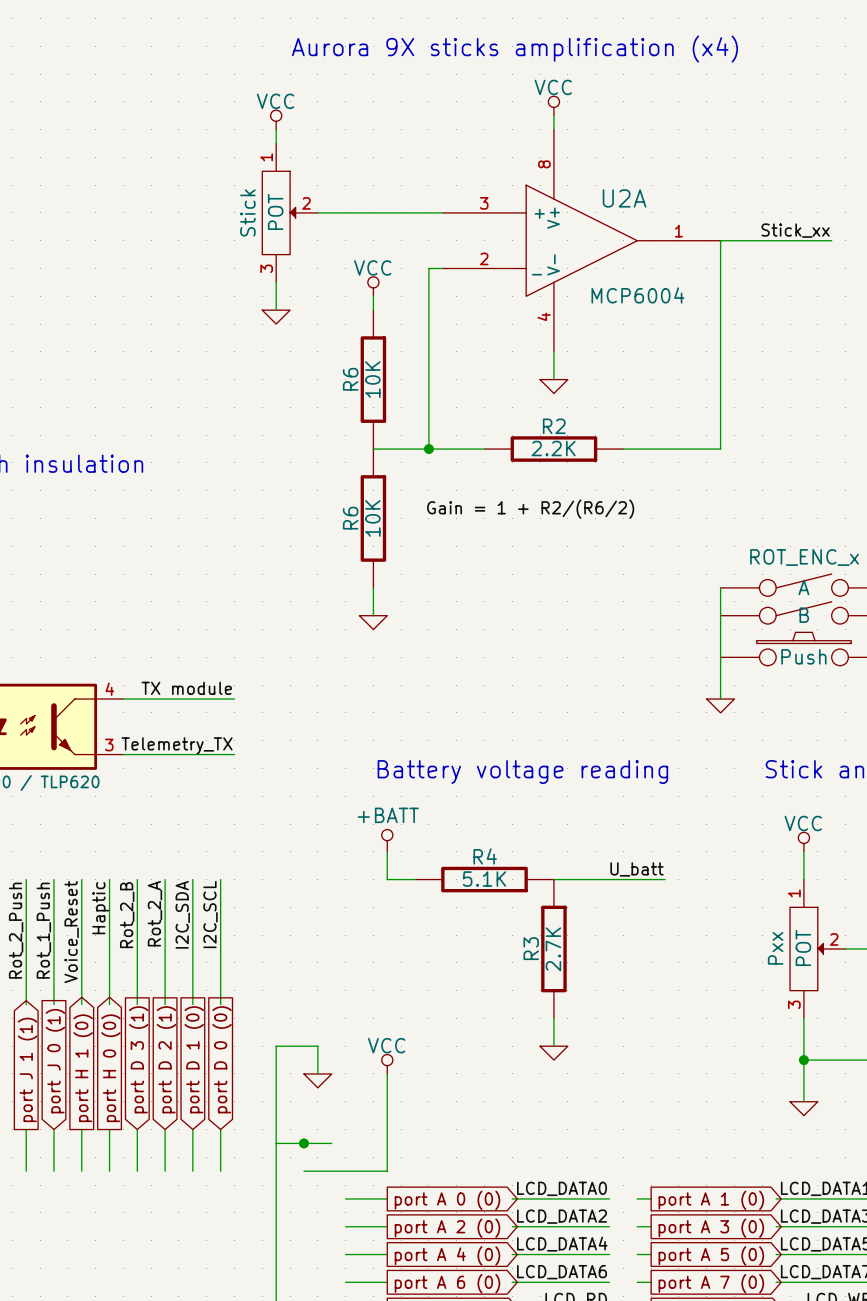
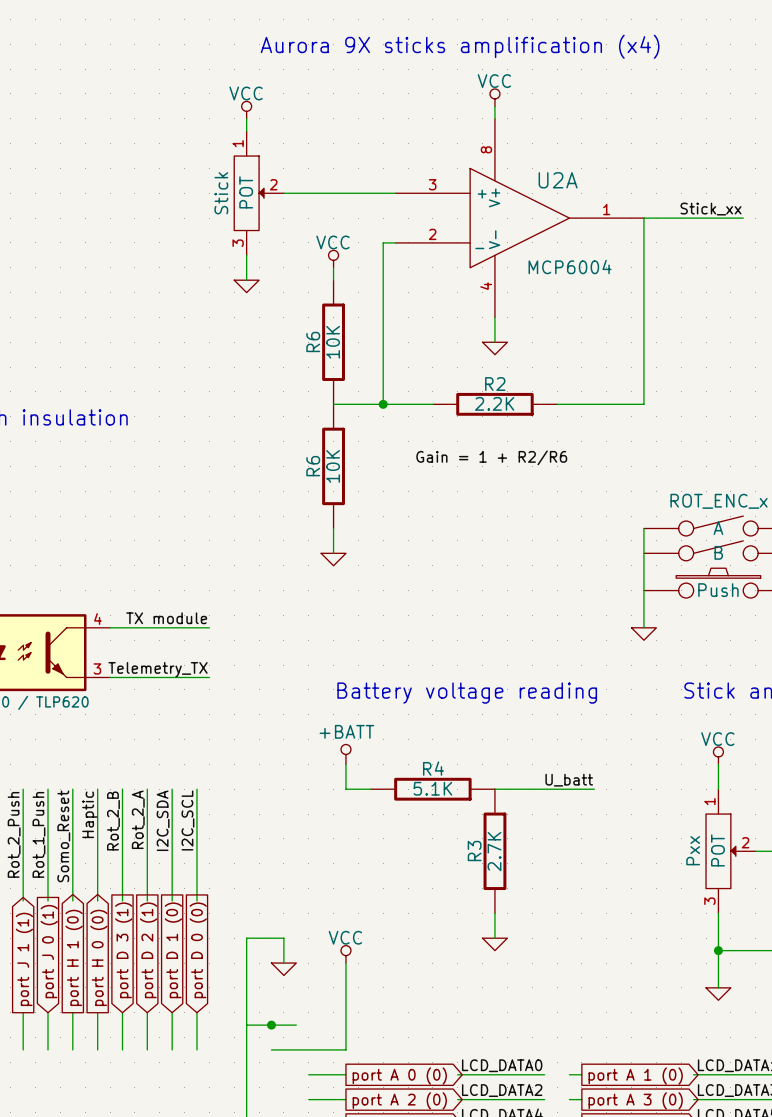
label: Gain = 1 + R2/(R6/2) (530, 509) -> Gain = 1 + R2/R6 (491, 457)
label: Voice_Reset (71, 932) -> Somo_Reset (63, 836)

